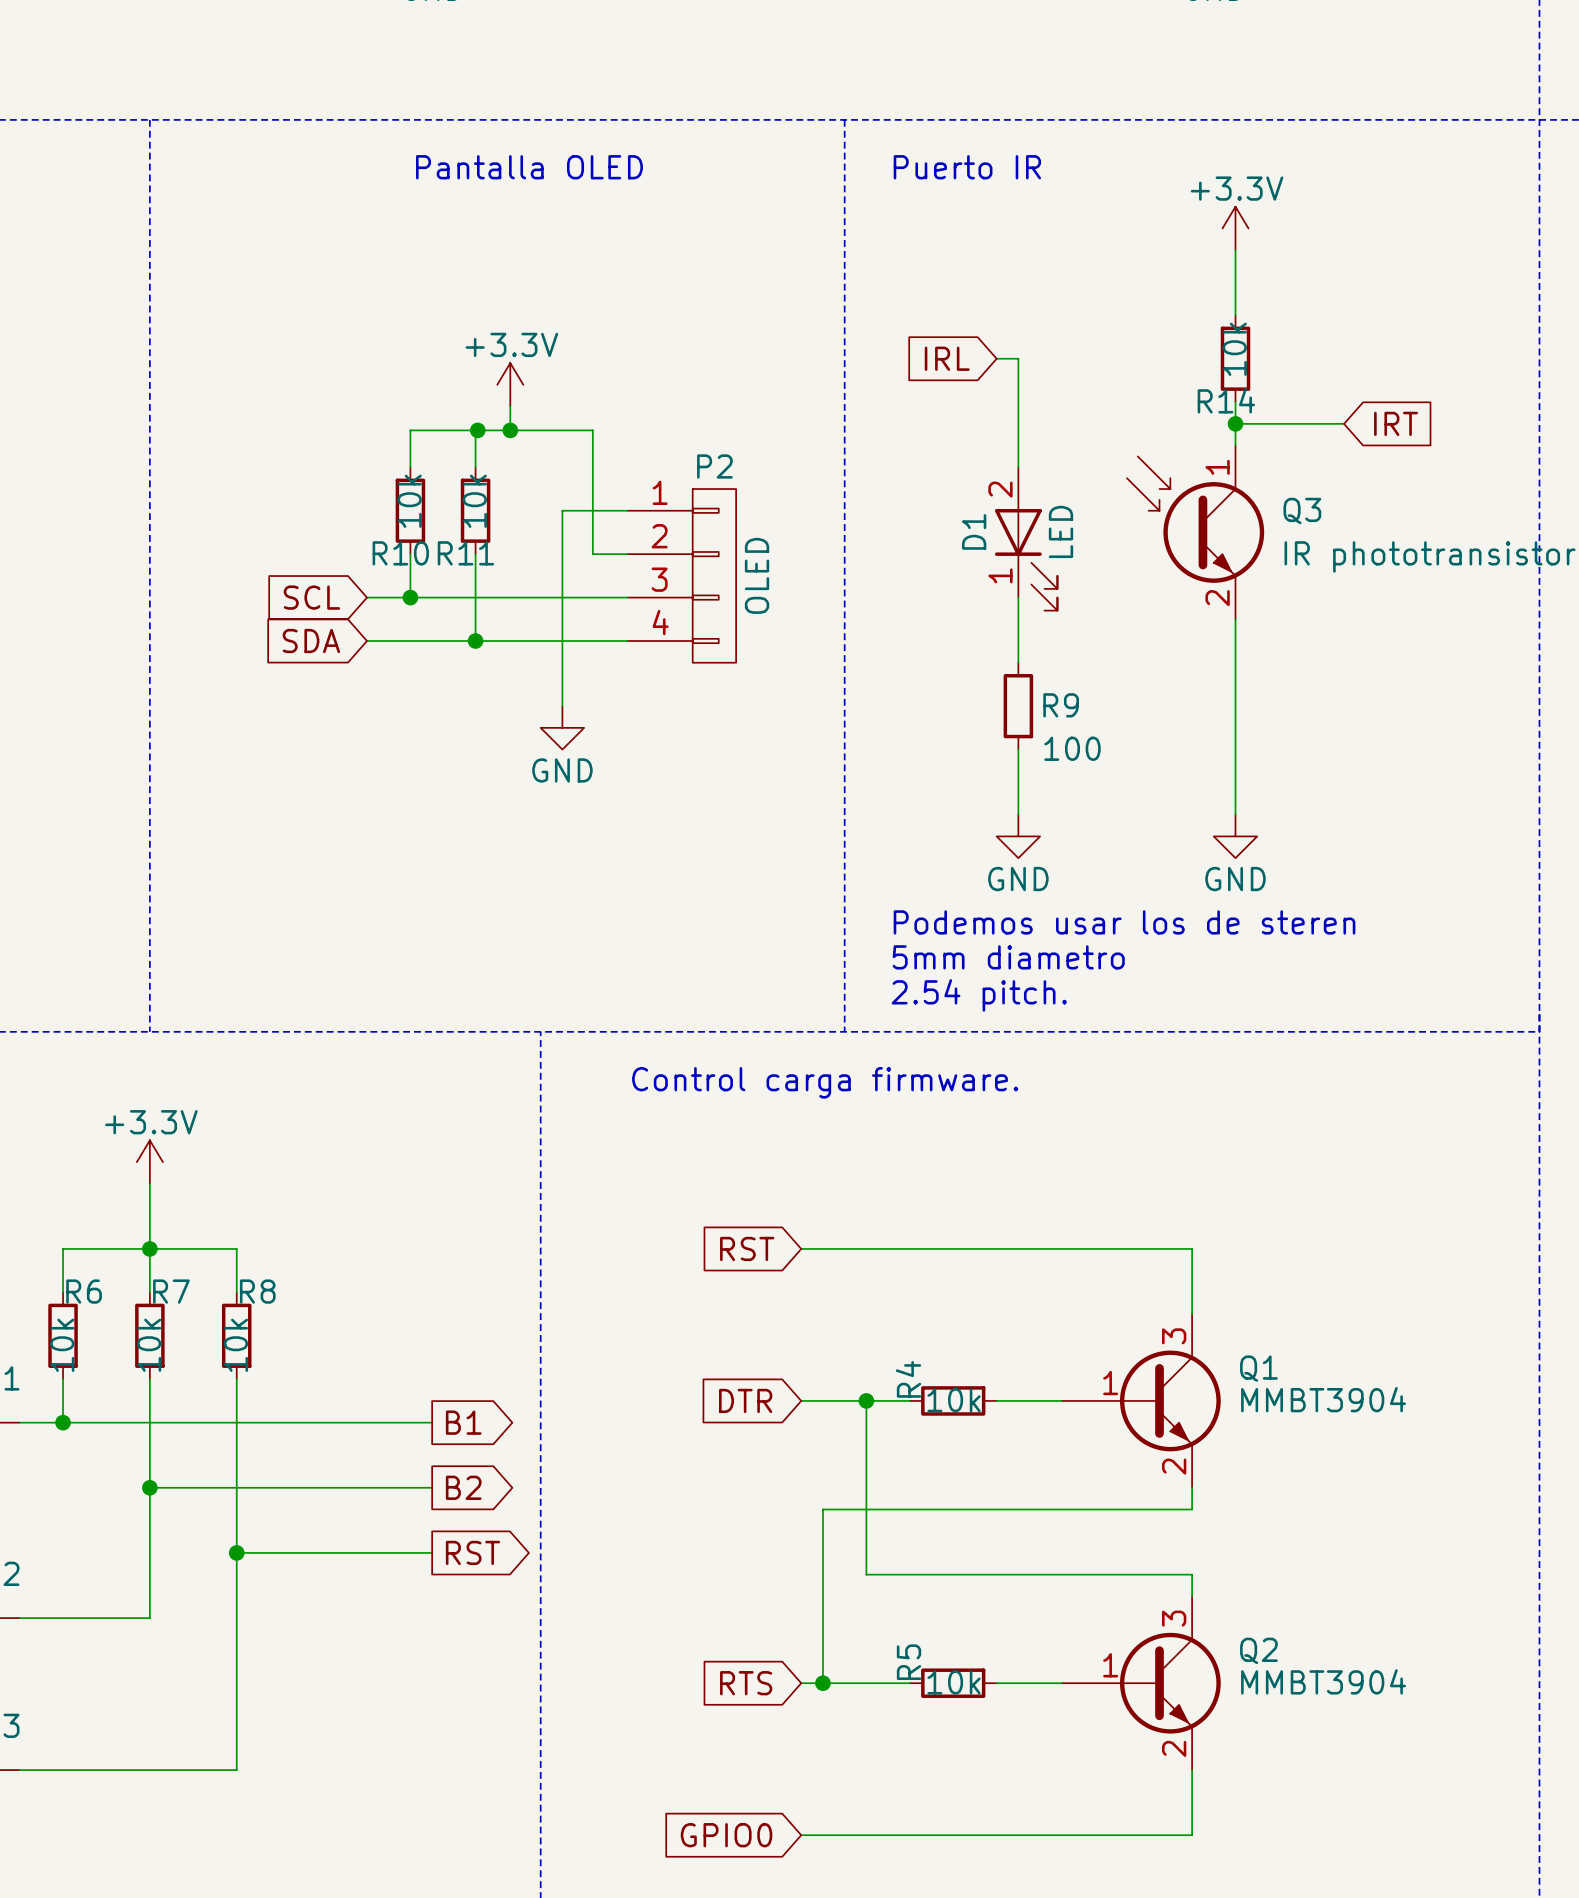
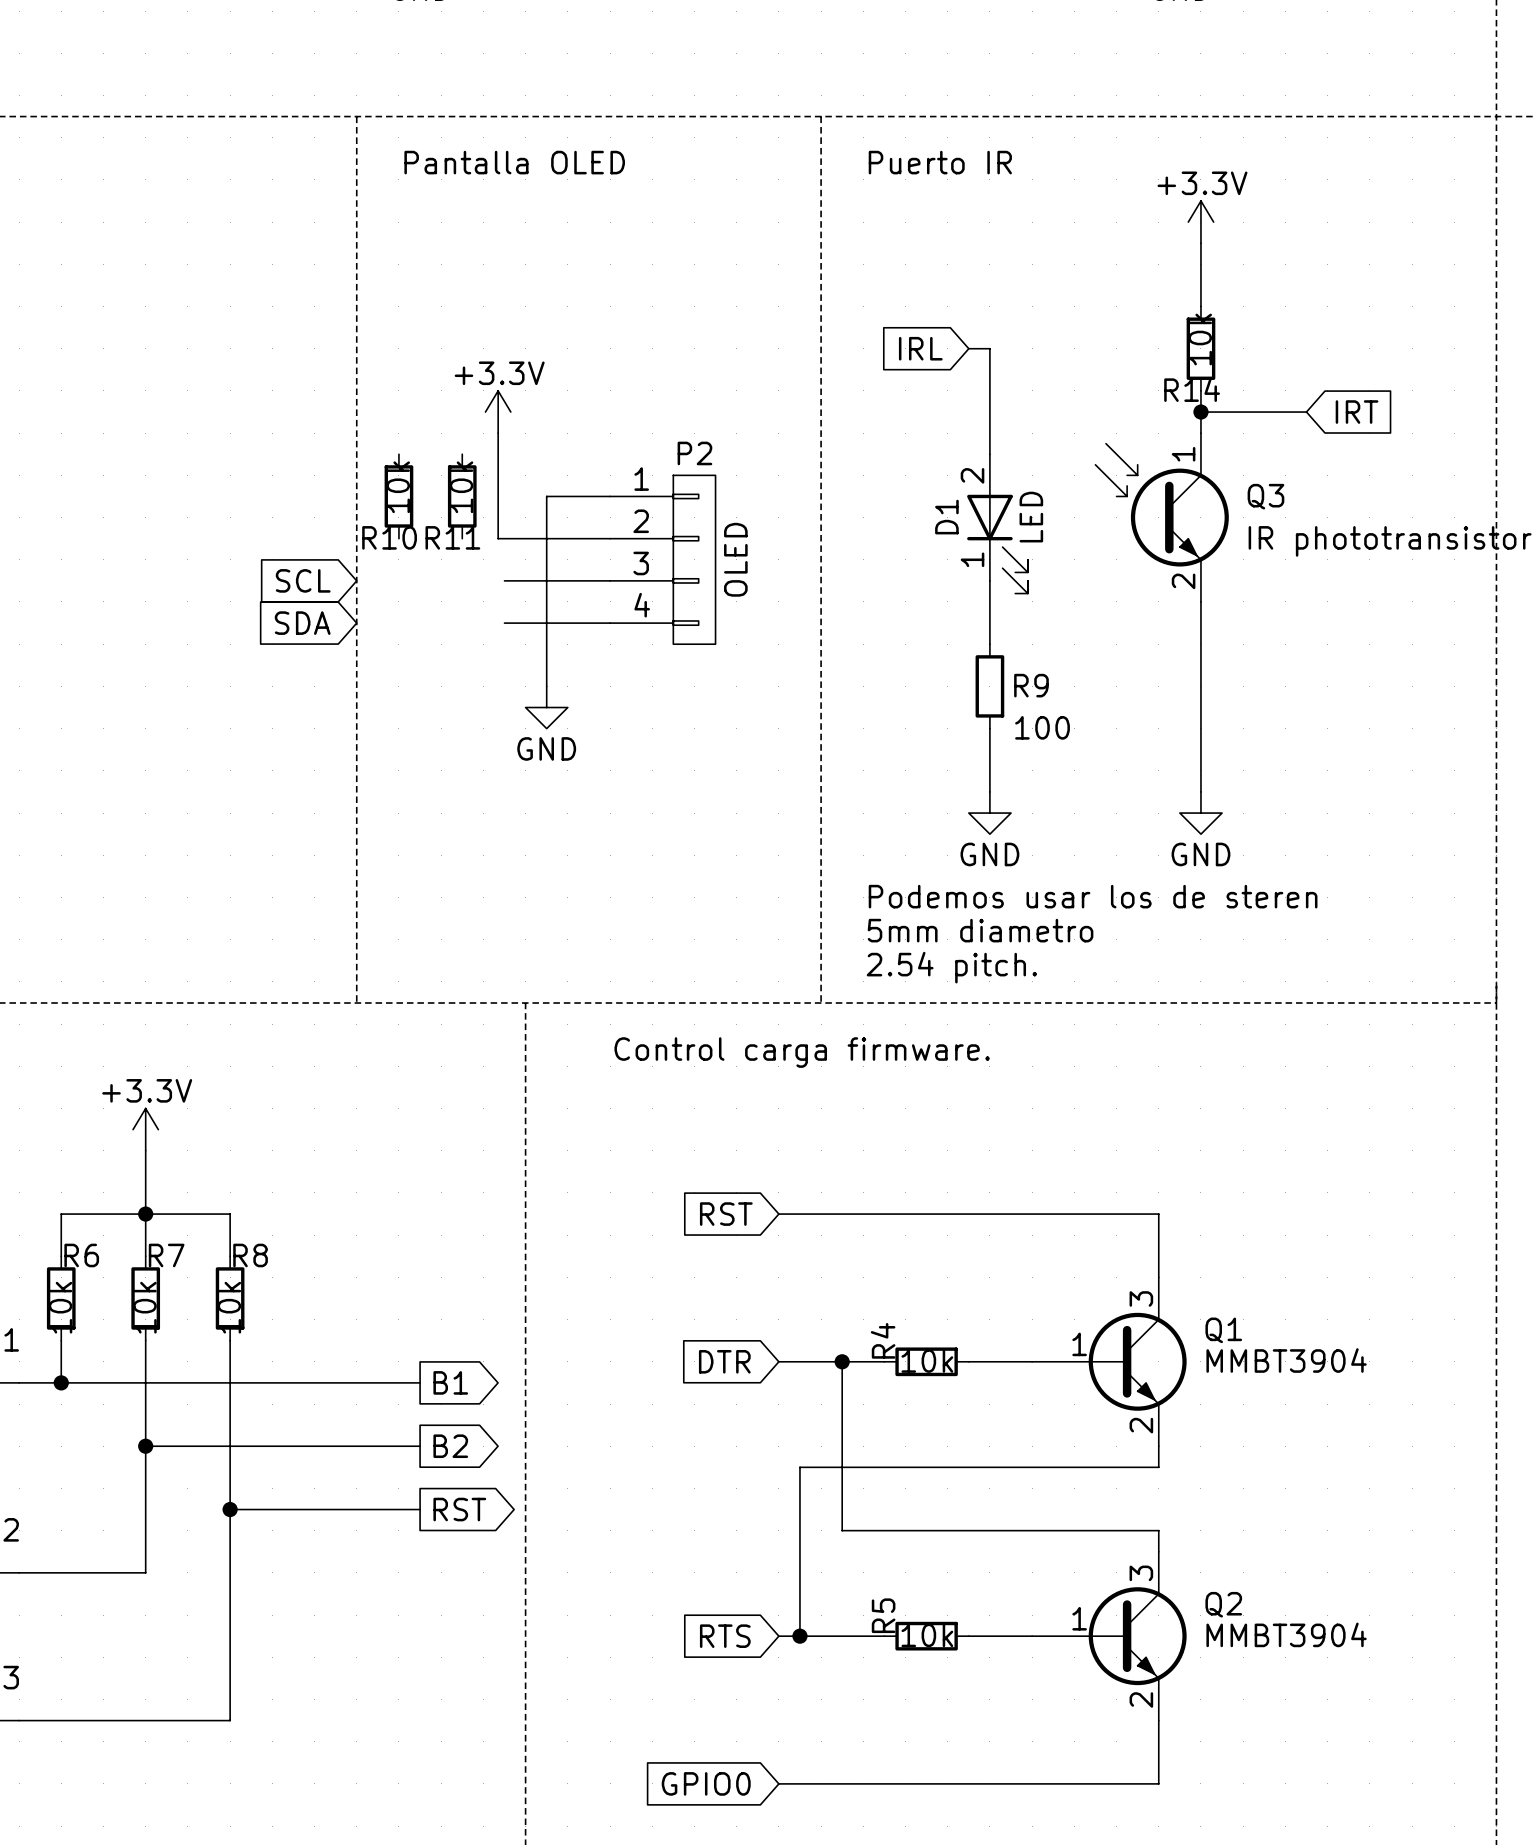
line: (149, 119) (149, 1031) -> (356, 116) (356, 1003)
power symbol position: +3.3V (510, 384) -> +3.3V (498, 412)
wire: (510, 406) (510, 430) -> none
wire: (475, 430) (475, 467) -> none
junction: (477, 430) -> none
junction: (510, 430) -> none
wire: (410, 467) (410, 430) (592, 430) (592, 554) -> (498, 433) (498, 538) (576, 538)
wire: (410, 554) (410, 597) -> none
wire: (475, 554) (475, 641) -> none
wire: (367, 597) (518, 597) -> none
junction: (410, 597) -> none
wire: (367, 641) (518, 641) -> none
junction: (475, 641) -> none

